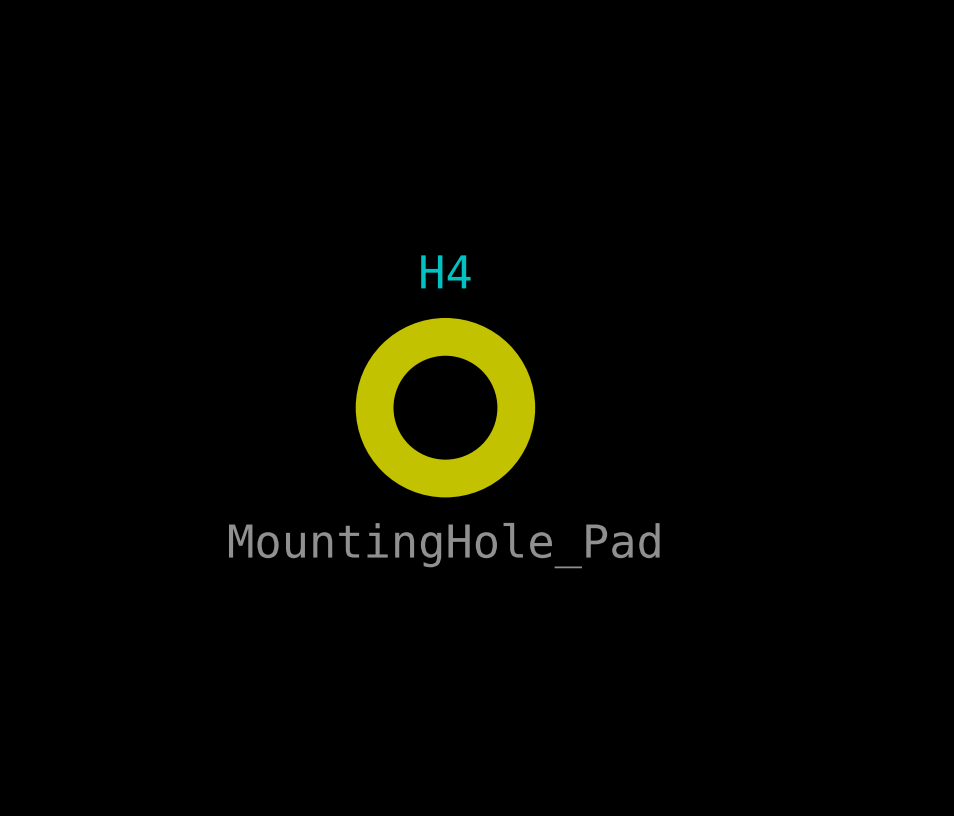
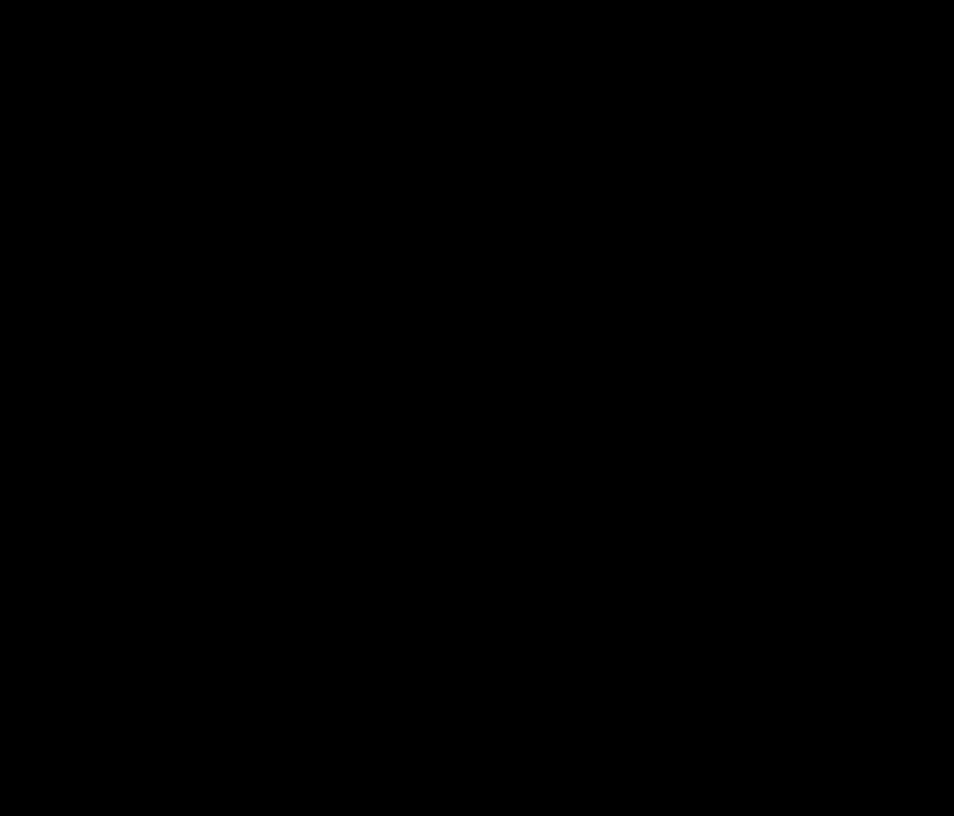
H4: MountingHole_Pad (445, 407) -> none

